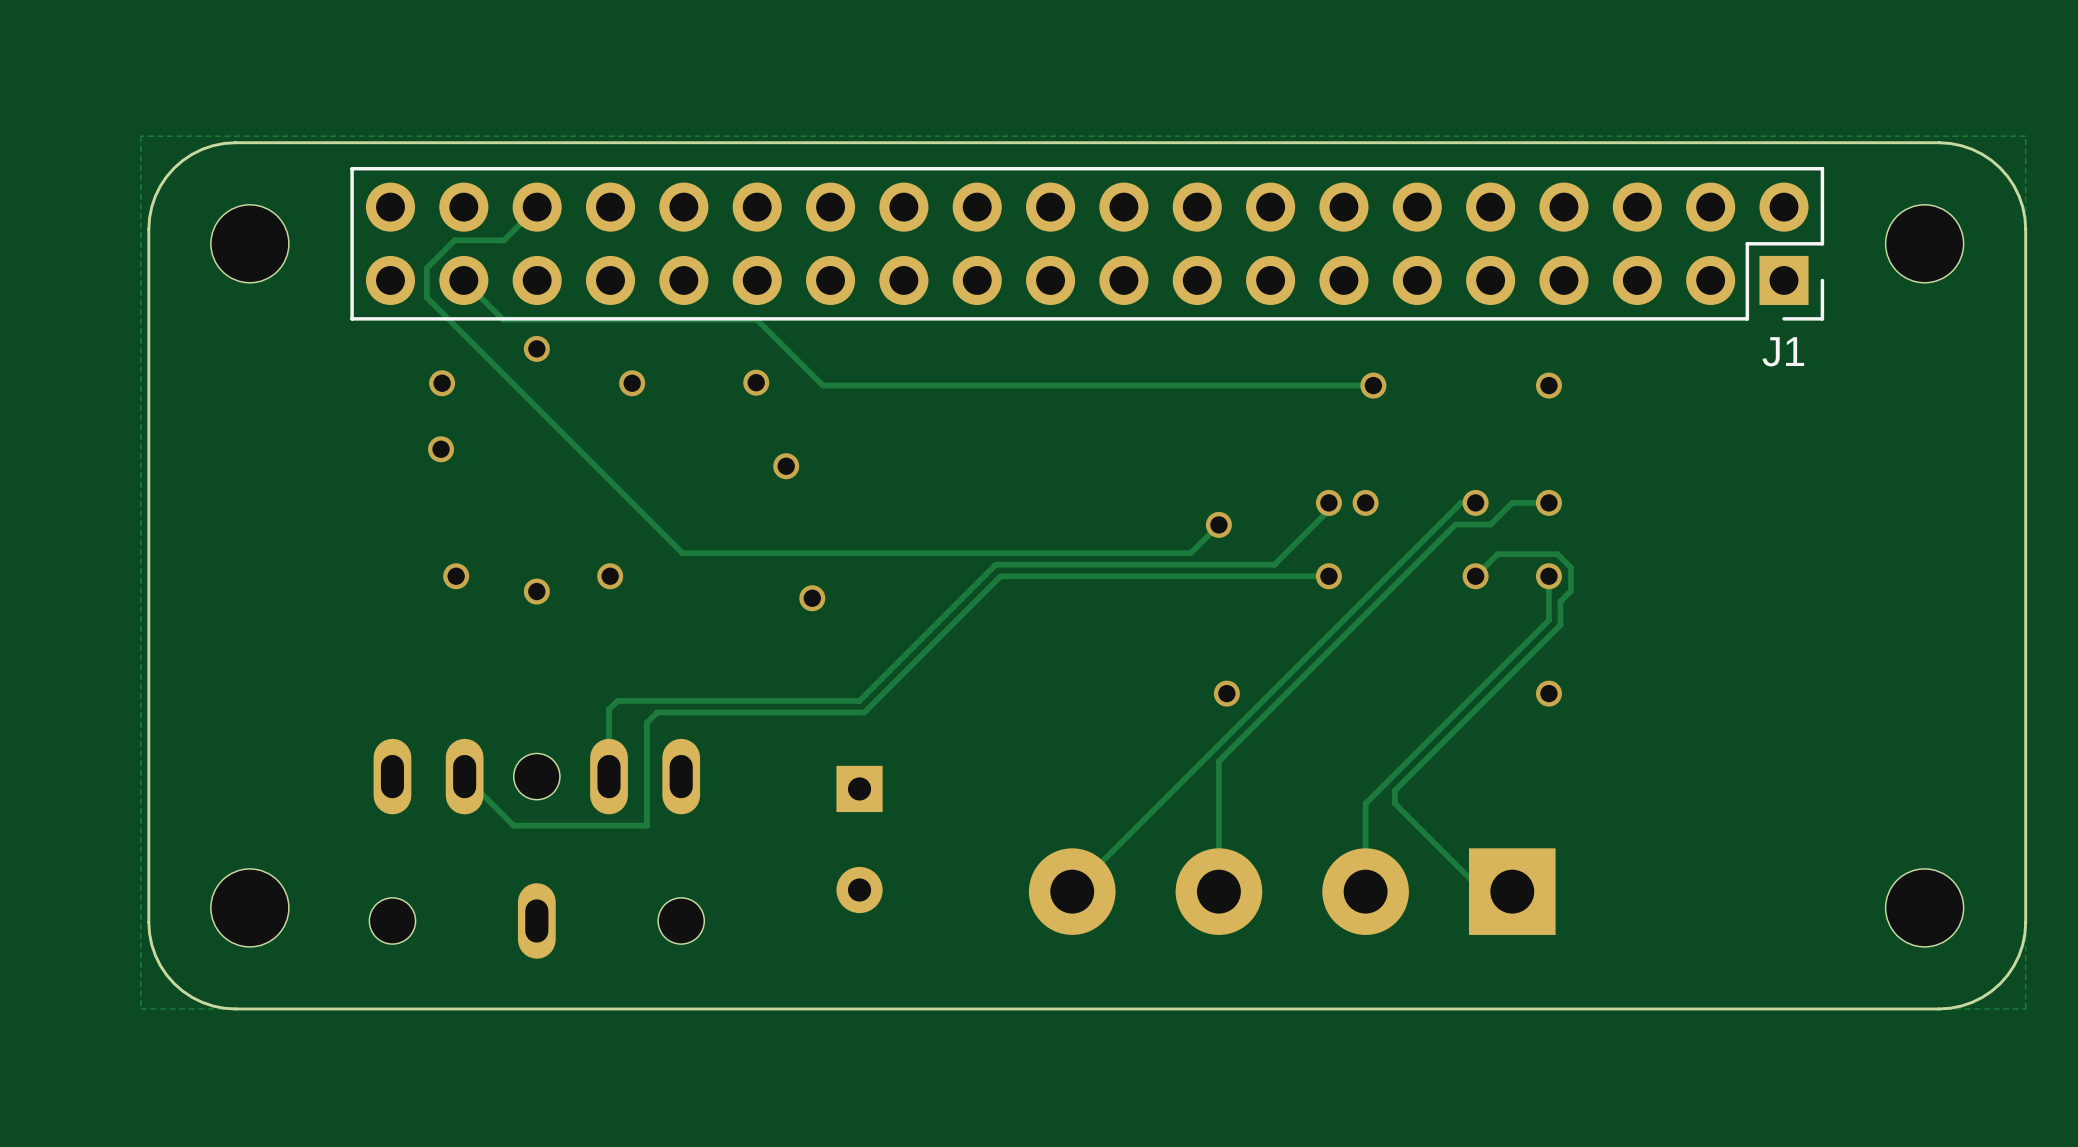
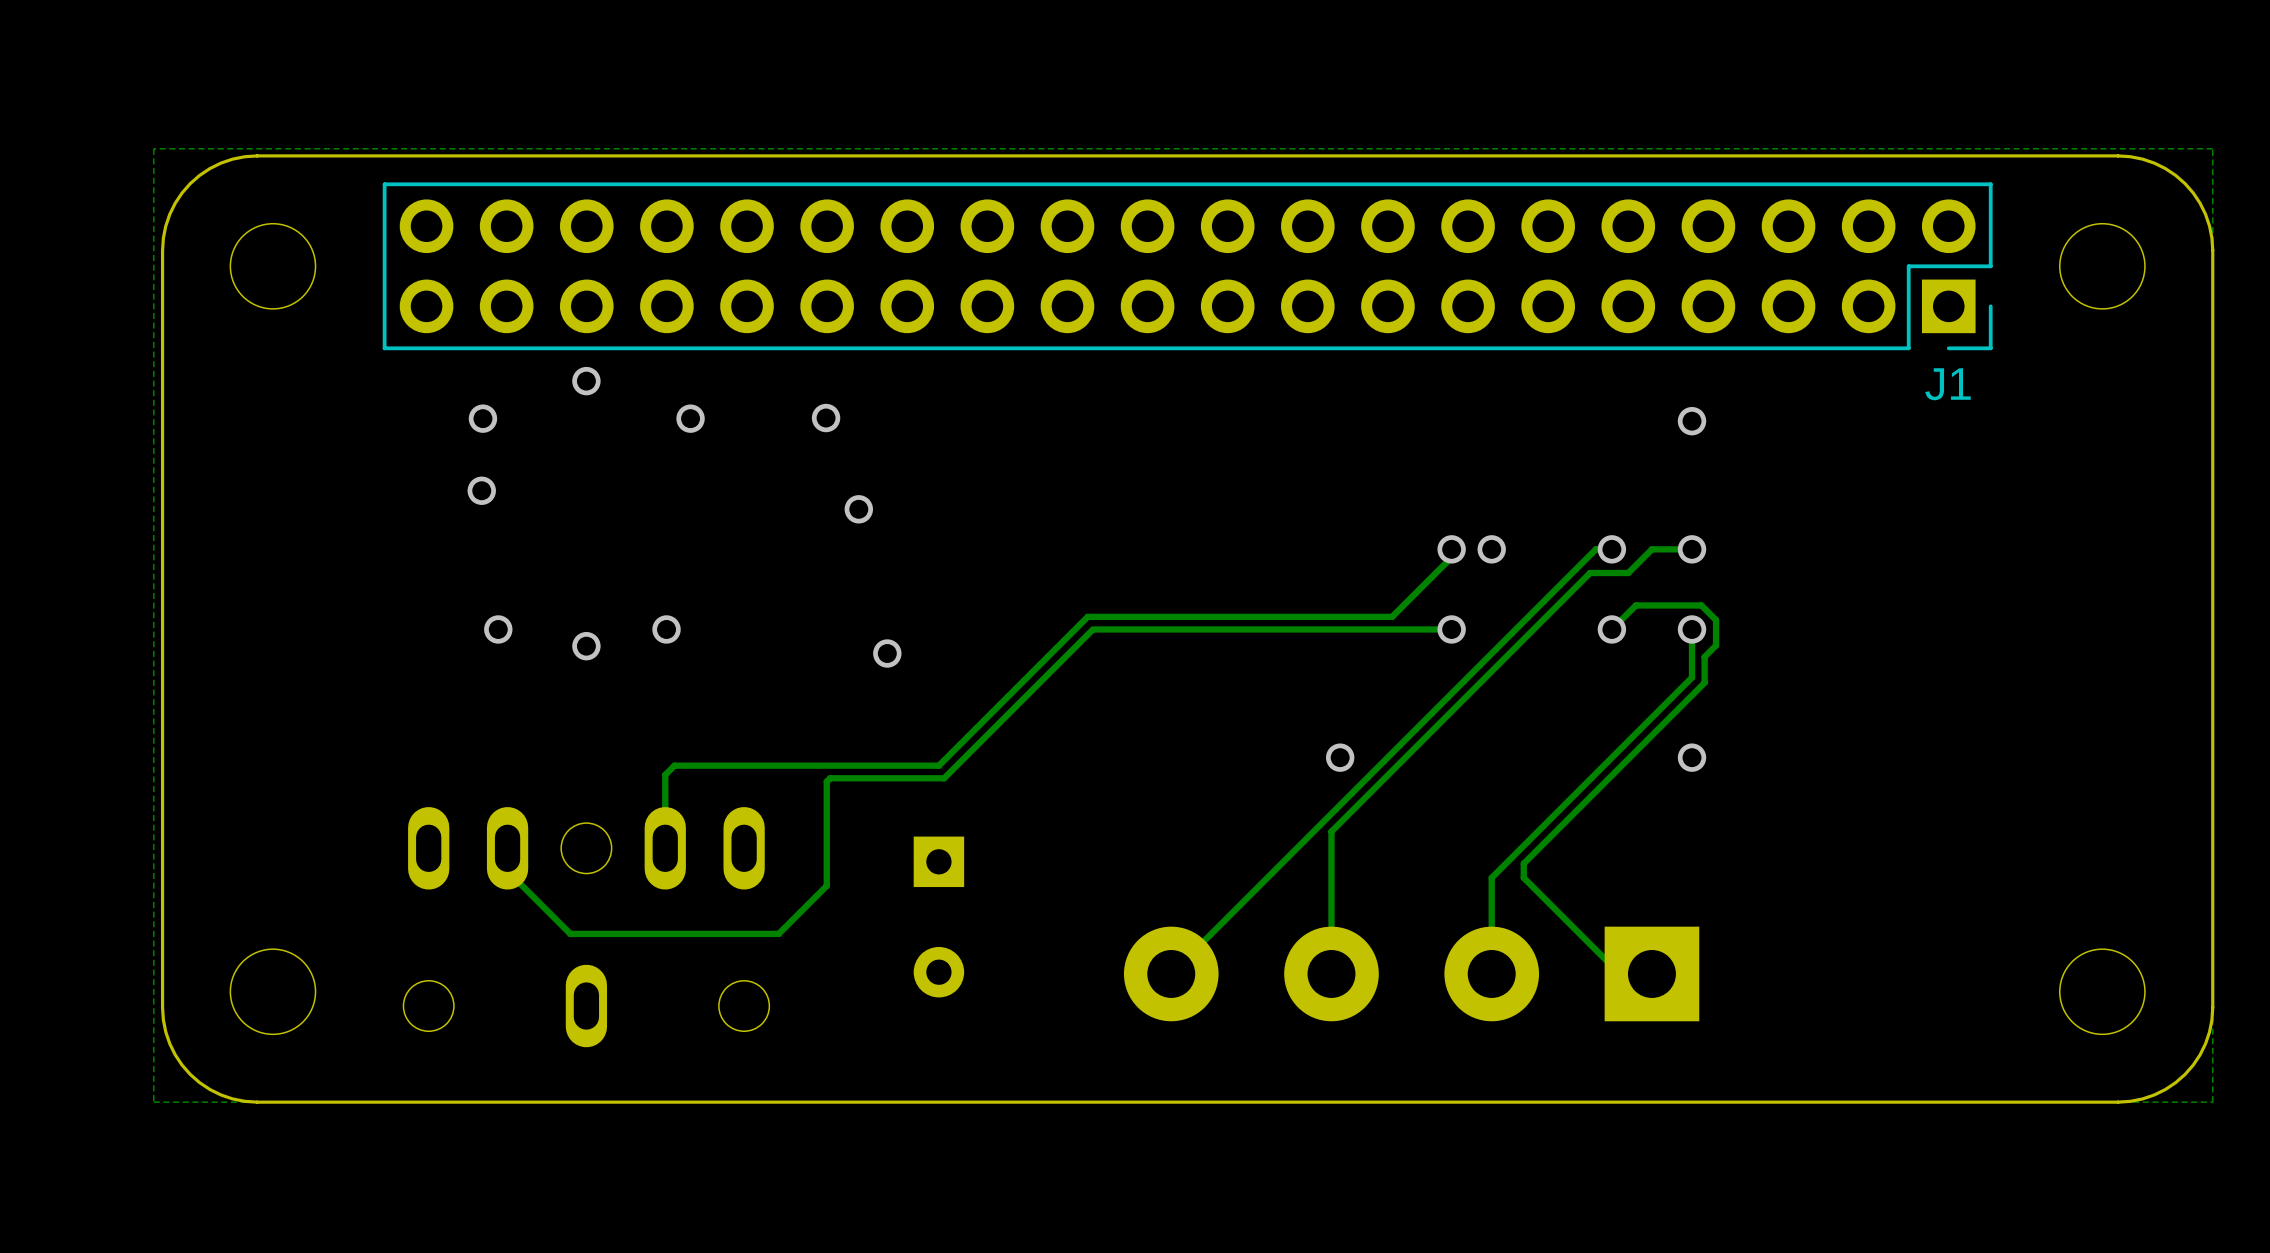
track: (537, 207) (503, 240) (454, 240) (426, 268) (426, 297) (682, 553) (1190, 553) (1218, 524) -> none
track: (463, 280) (502, 319) (756, 319) (822, 385) (1373, 385) -> none
via: (1373, 385) -> none
via: (1218, 524) -> none
track: (759, 712) (657, 712) (646, 722) (646, 825) (513, 825) (464, 776) -> (830, 778) (826, 781) (826, 885) (778, 933) (570, 933) (507, 871)

